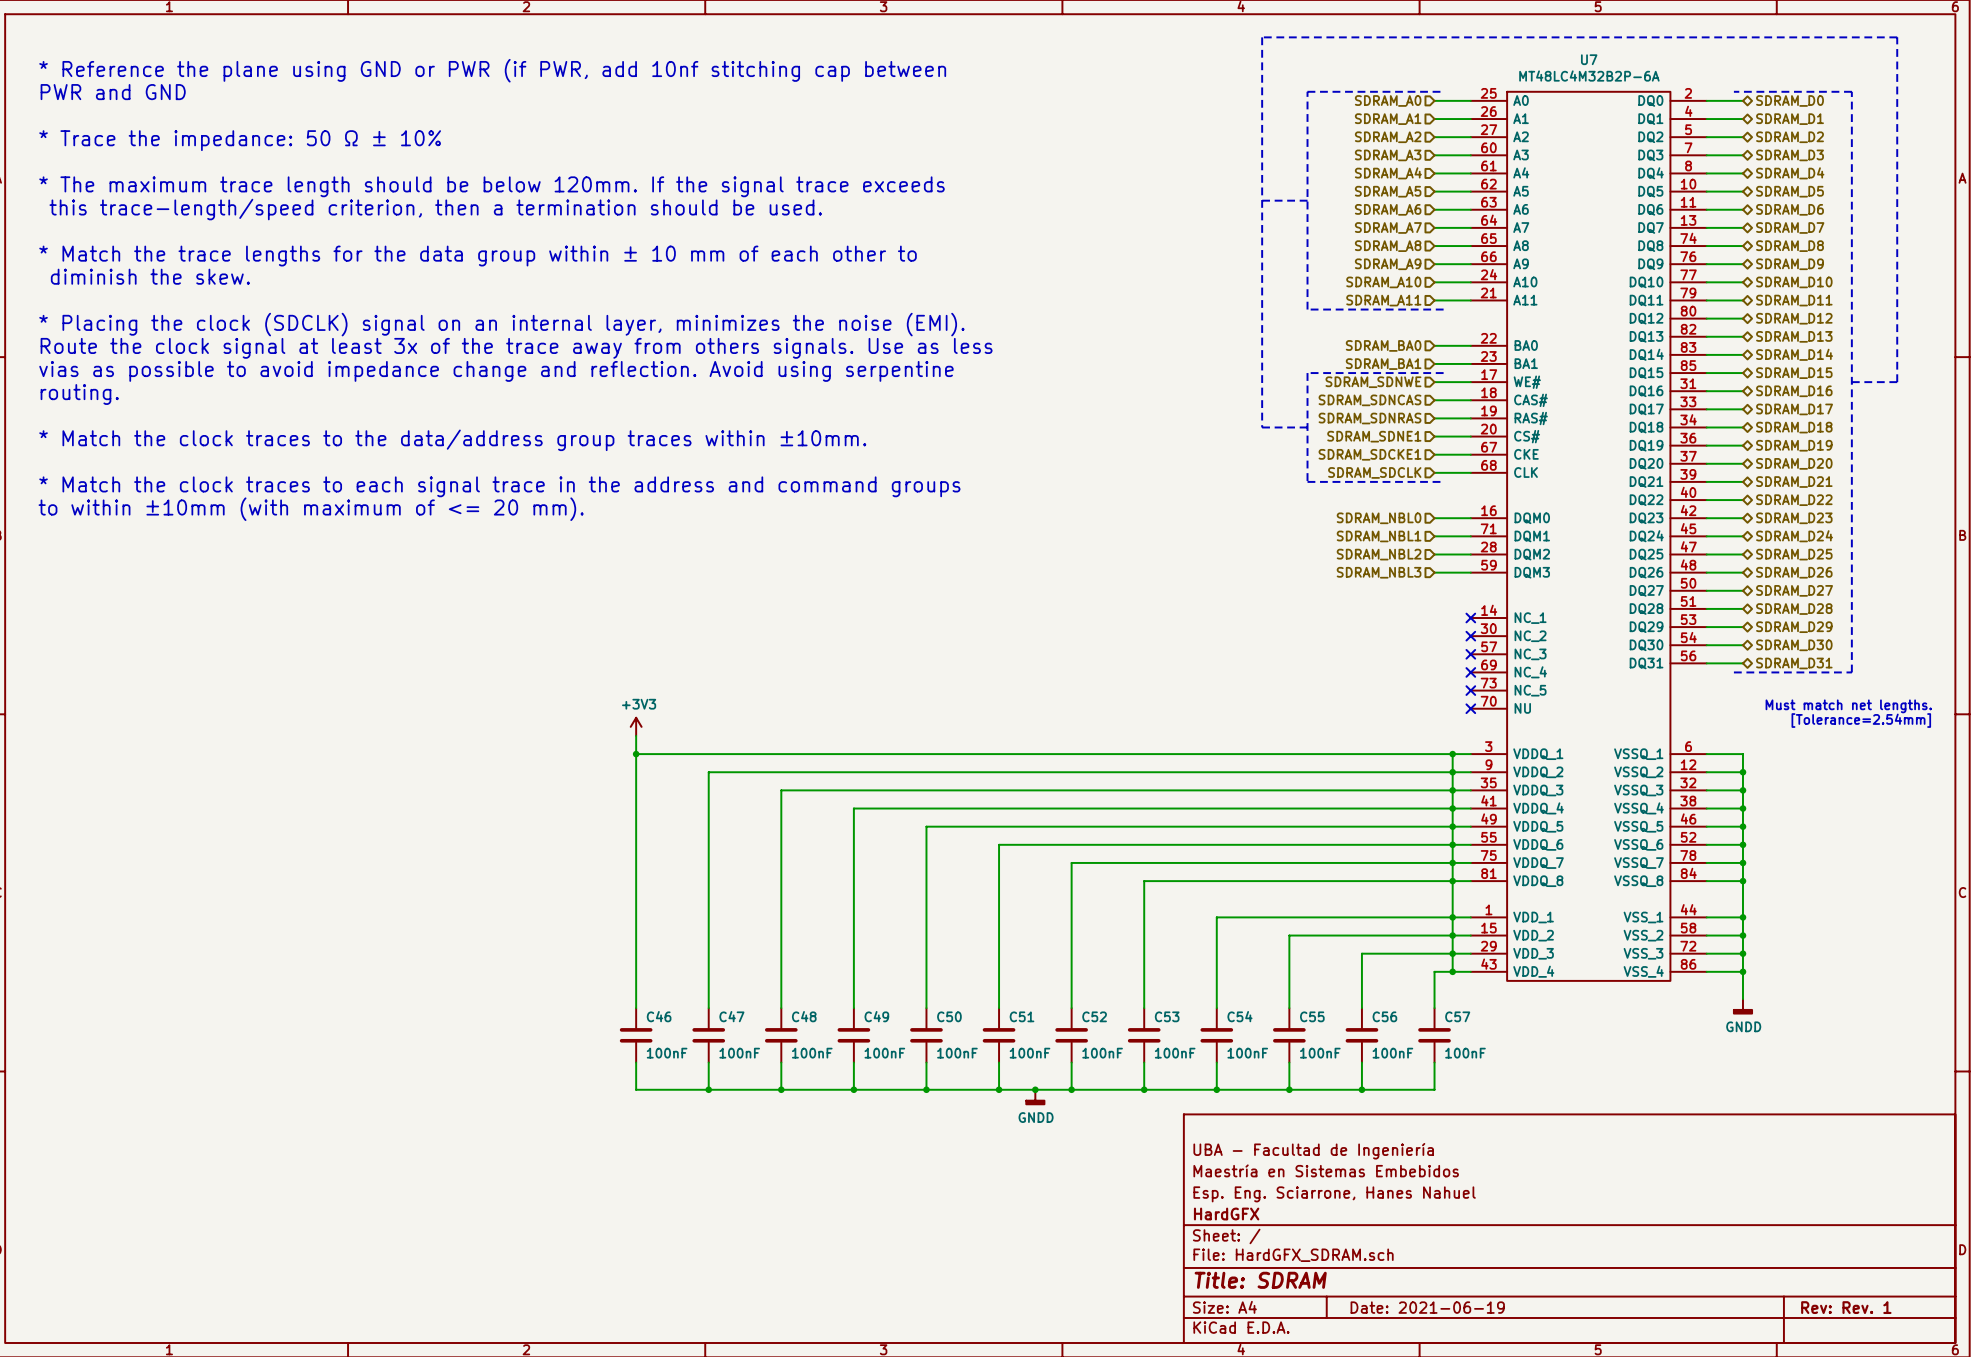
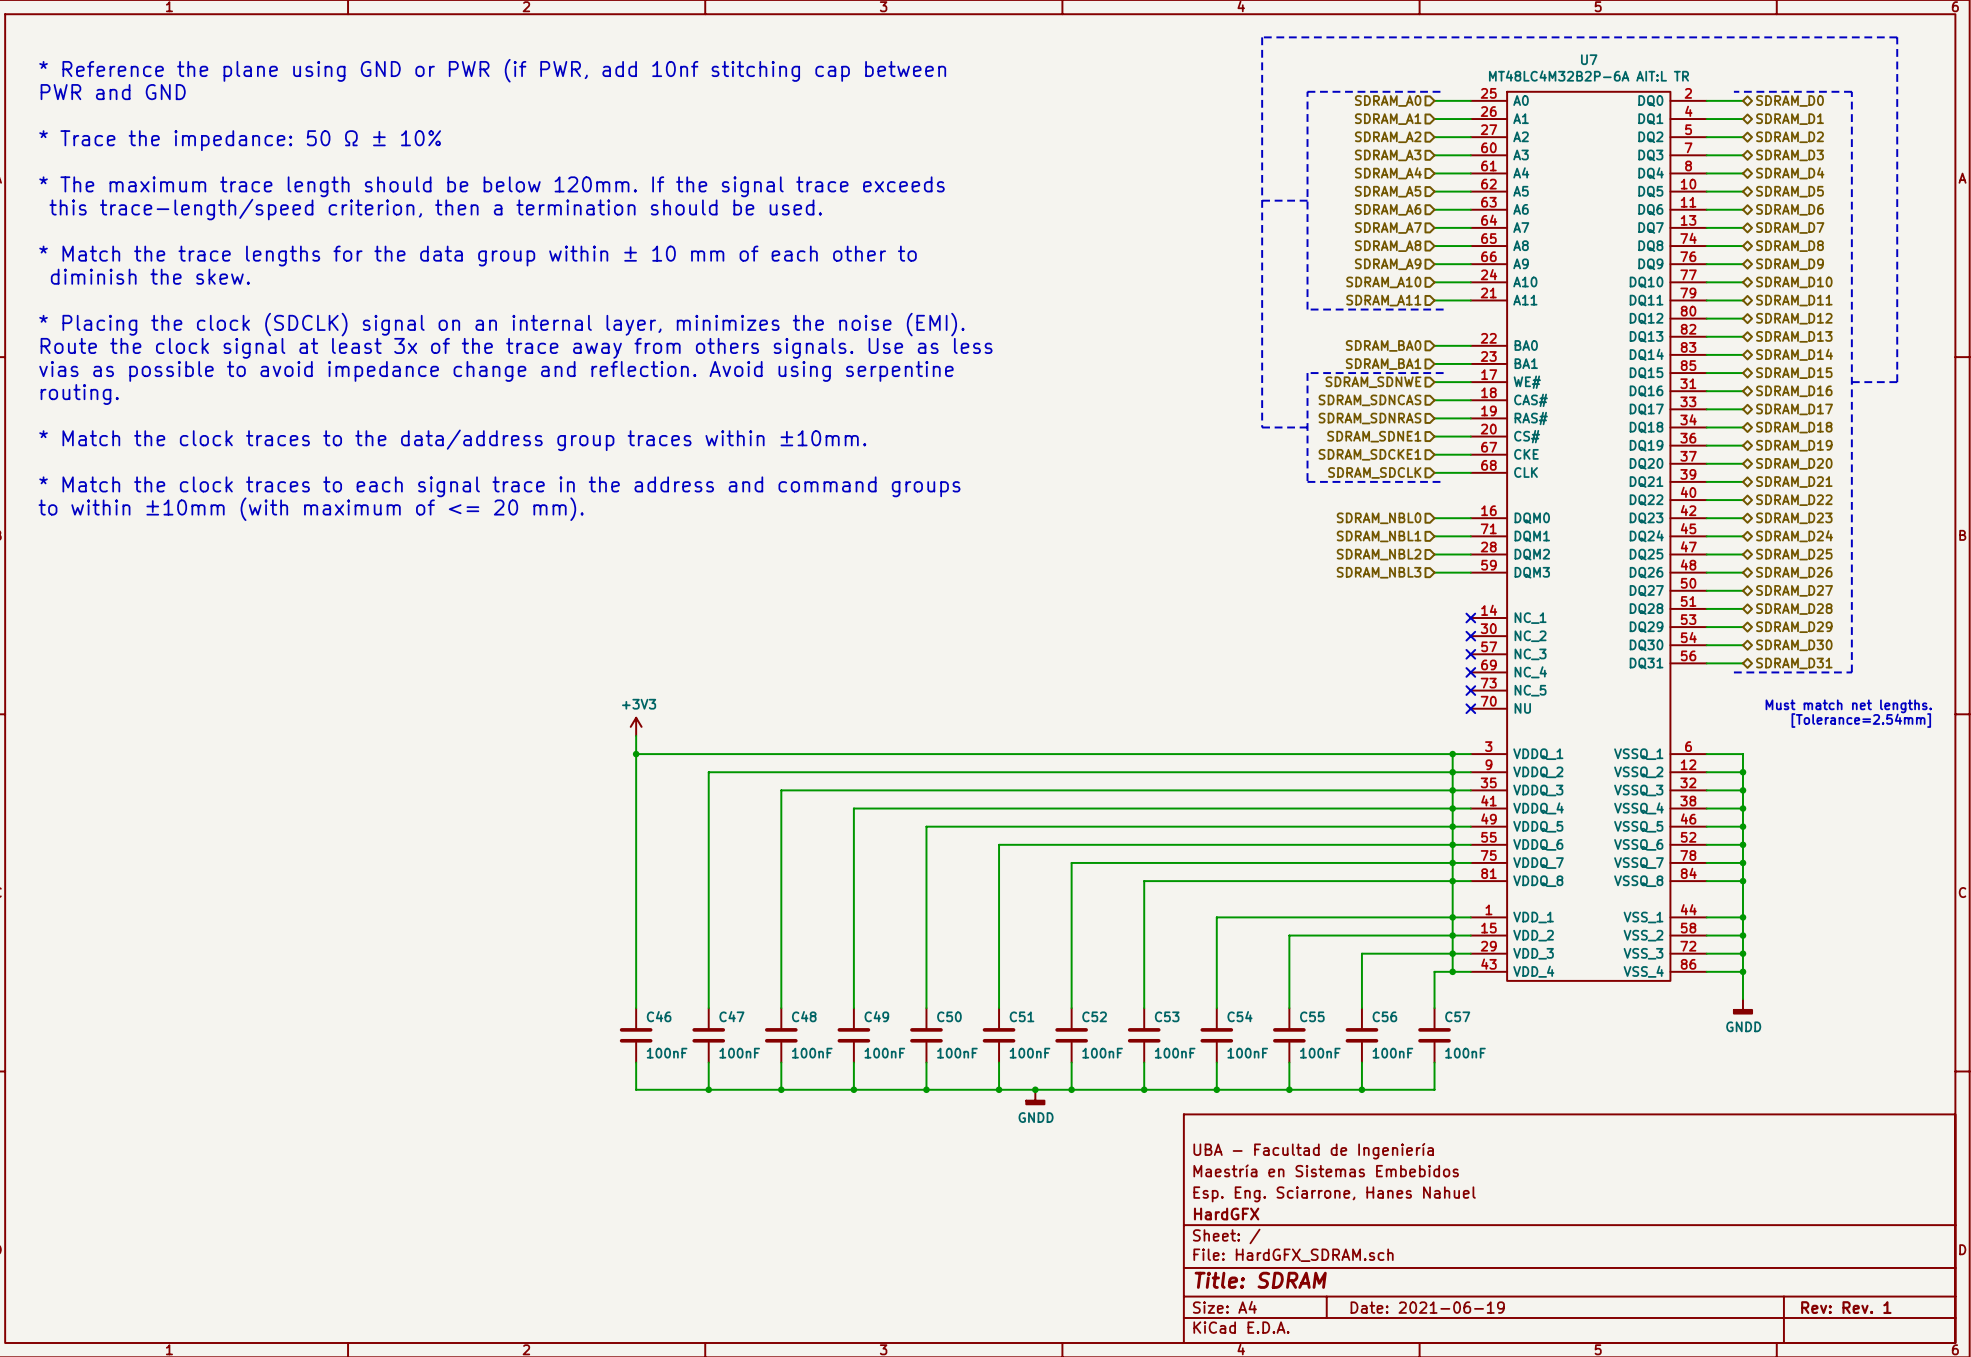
U7 value: MT48LC4M32B2P-6A (1589, 76) -> MT48LC4M32B2P-6A AIT:L TR (1588, 76)

